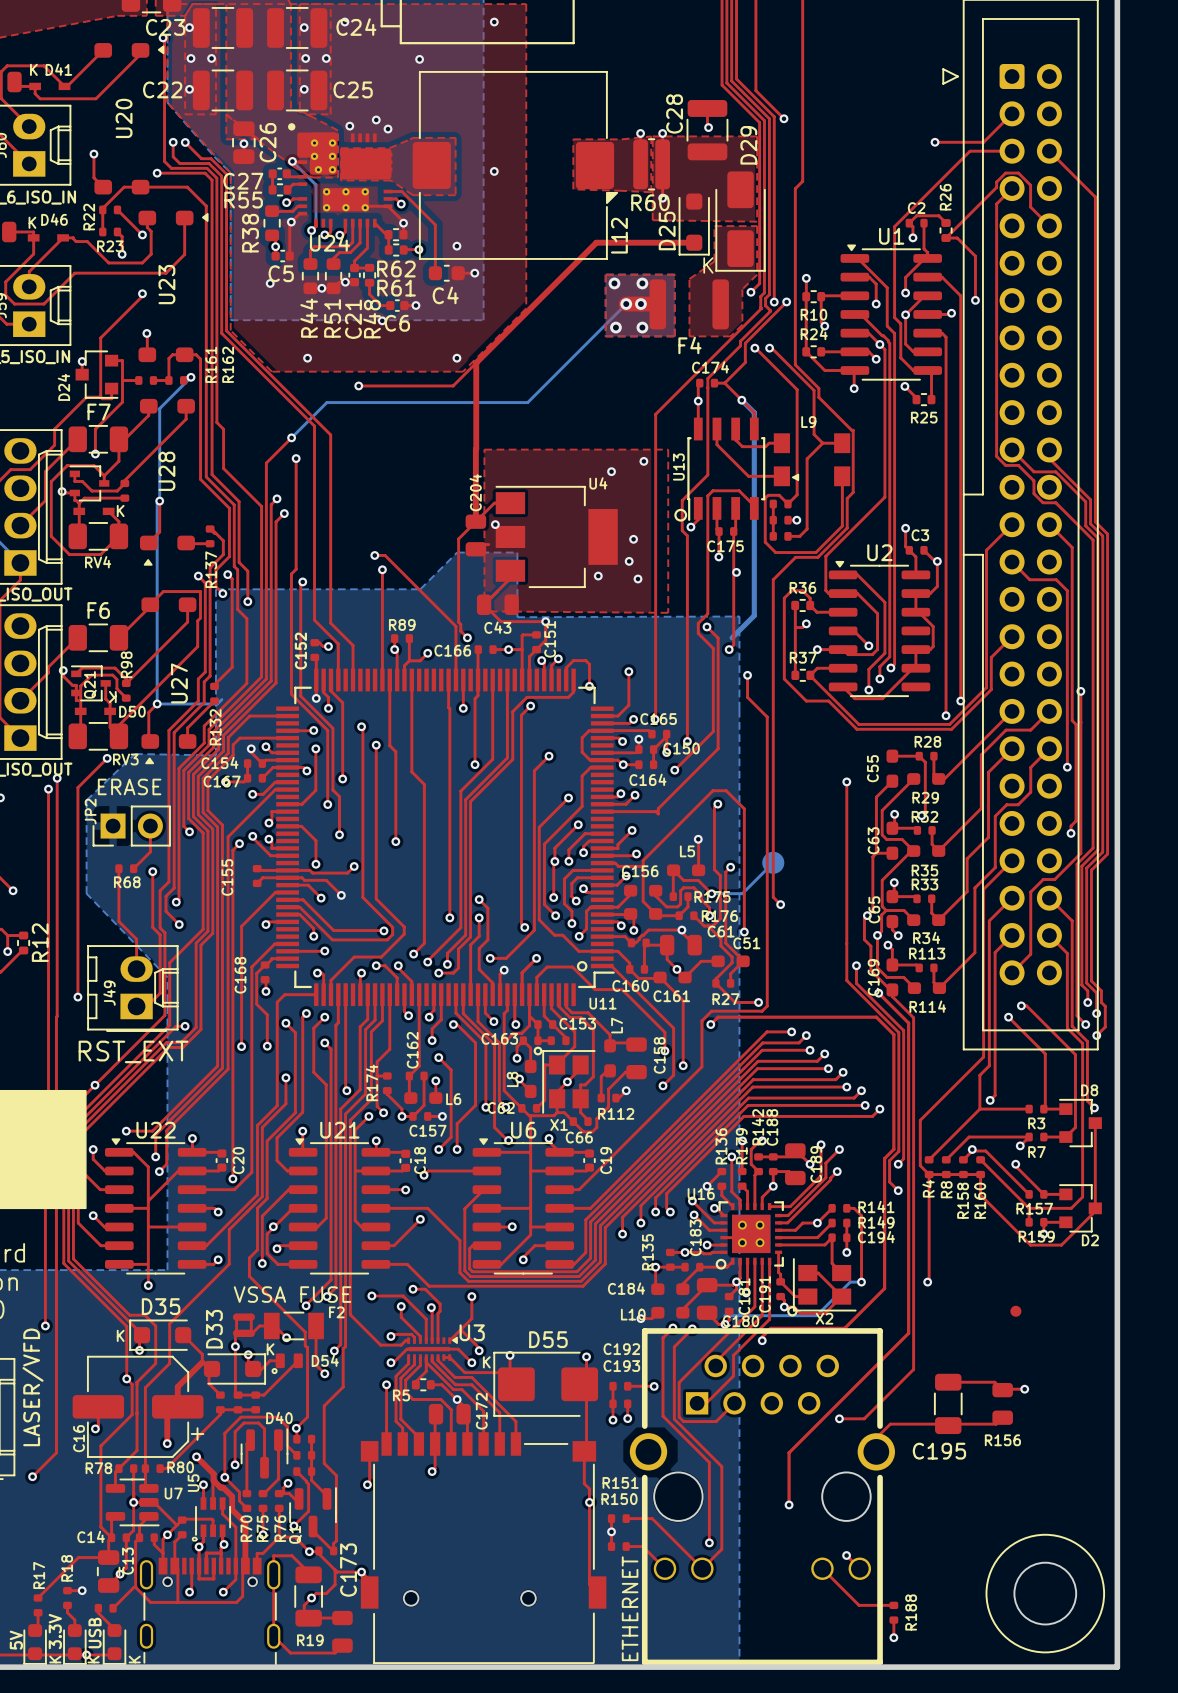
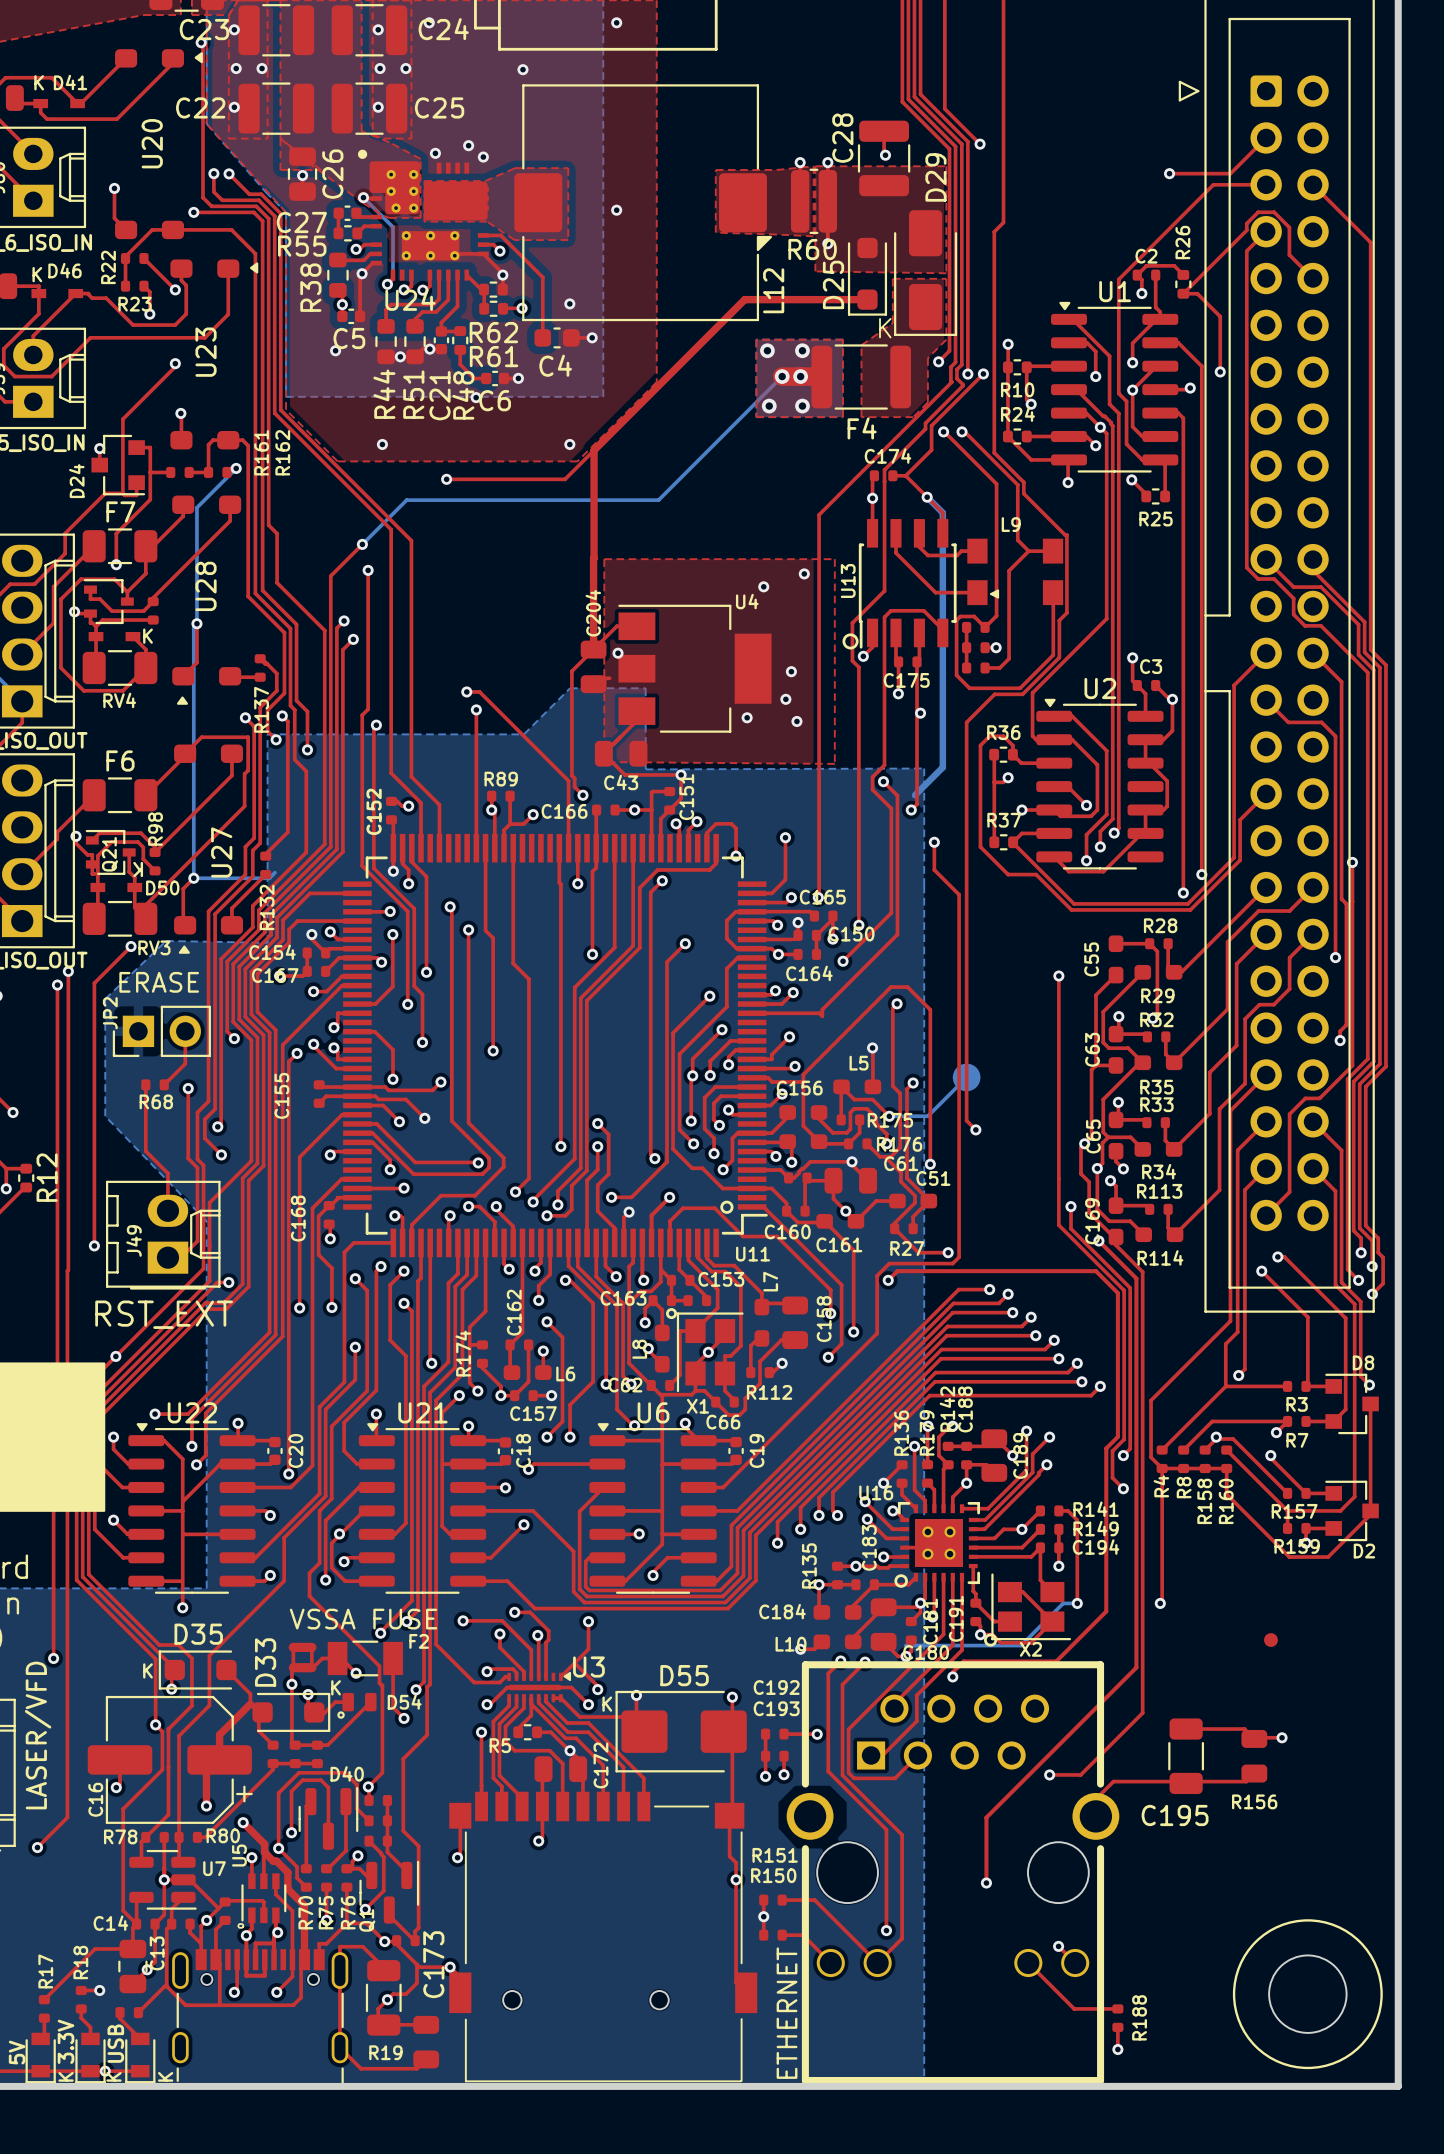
F4 footprint: [649, 279, 729, 330] -> [811, 344, 912, 410]
part footprint: [23, 1624, 47, 1665] -> [25, 2032, 56, 2084]
part footprint: [63, 1624, 87, 1665] -> [75, 2032, 106, 2084]
part footprint: [102, 1624, 127, 1665] -> [125, 2032, 156, 2084]

